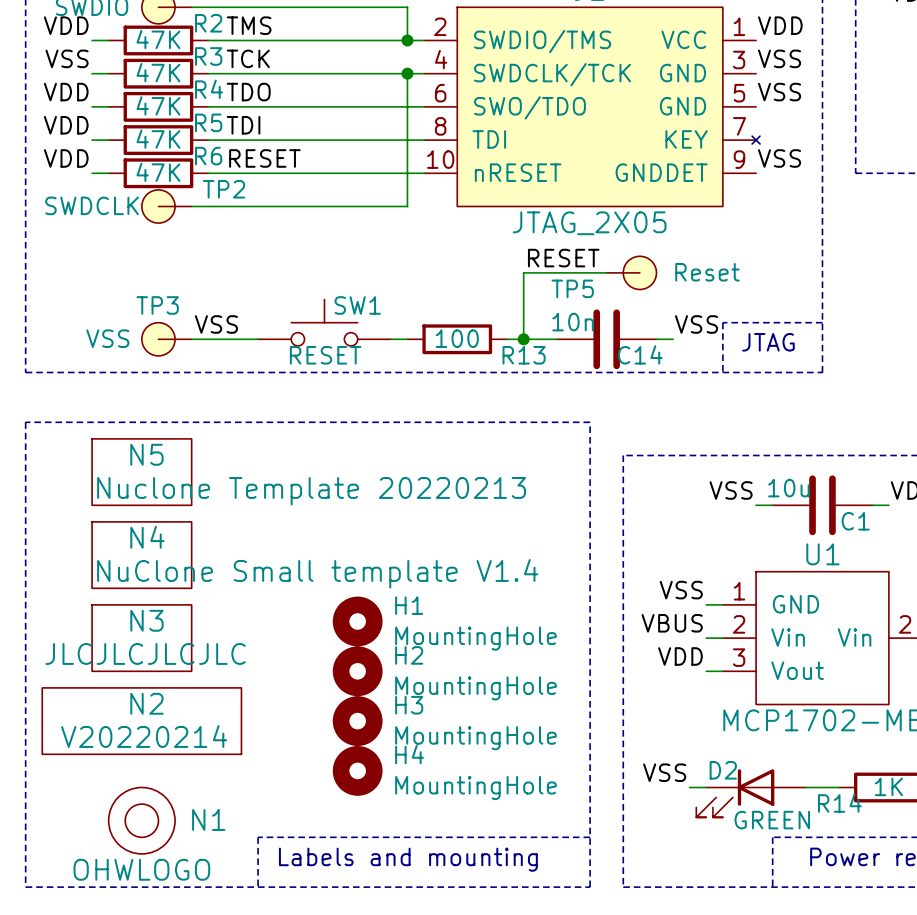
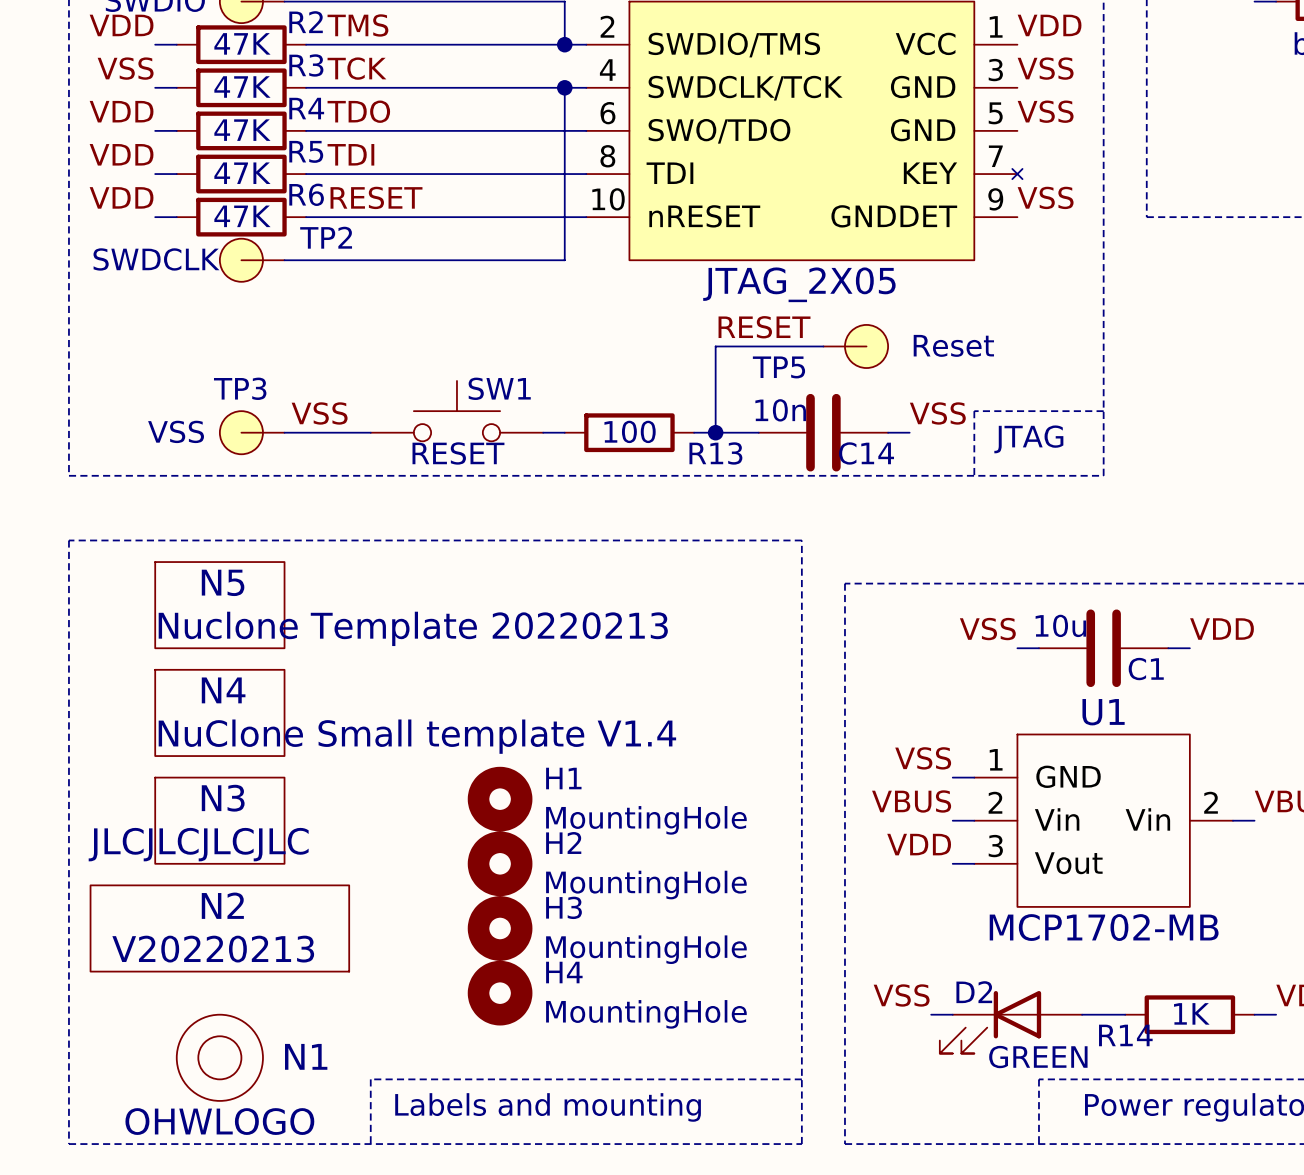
N2 value: V20220214 (144, 736) -> V20220213 (213, 949)

